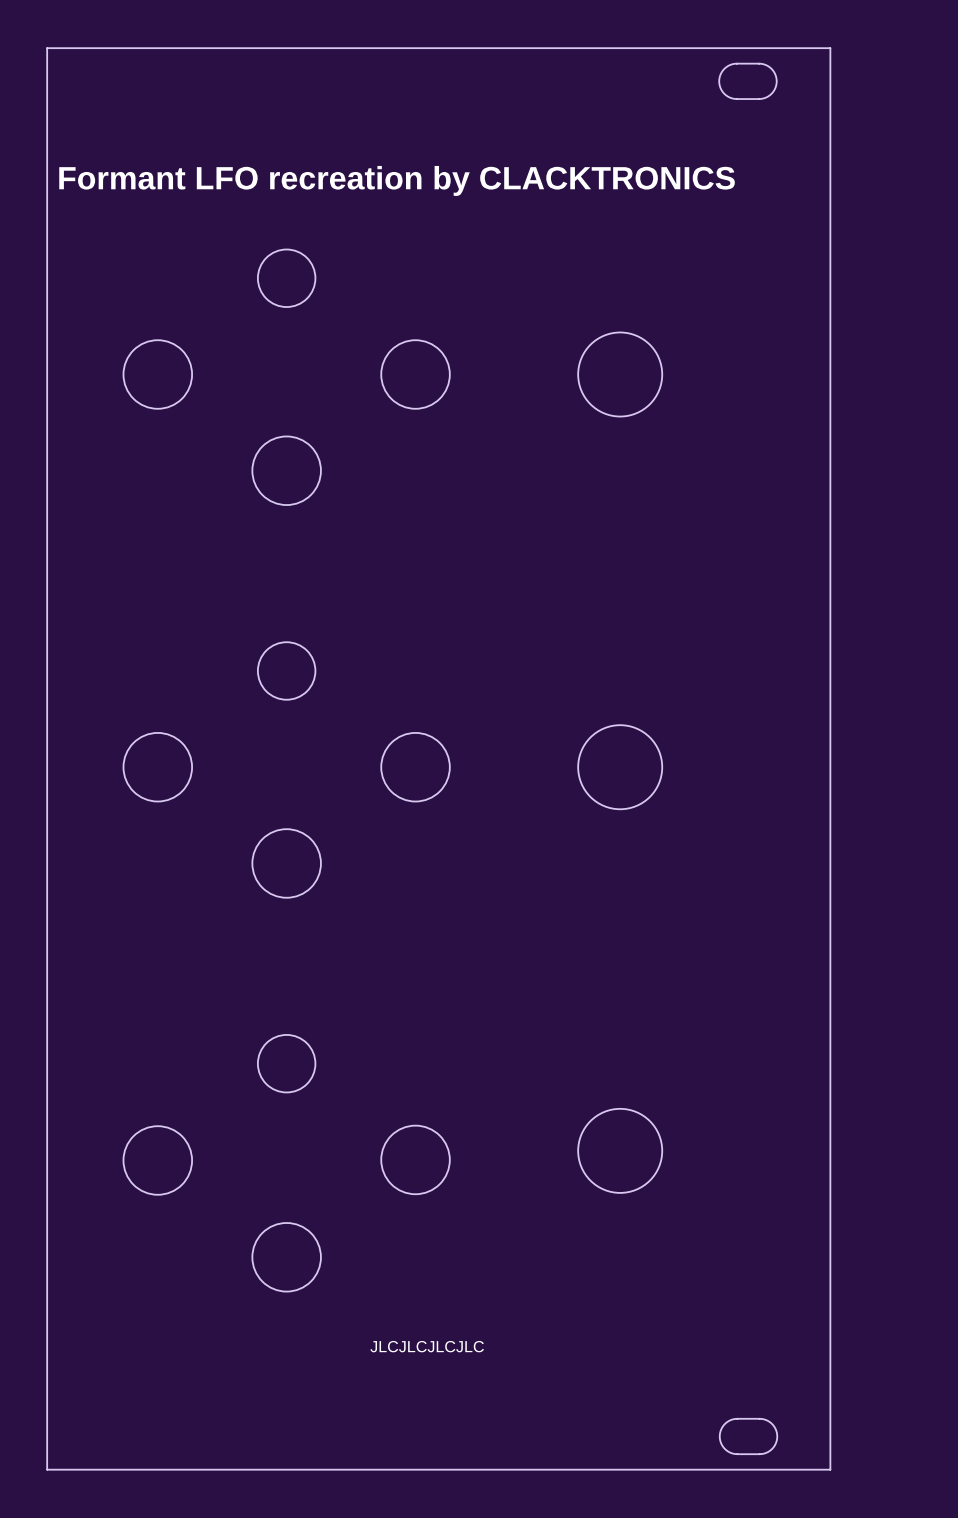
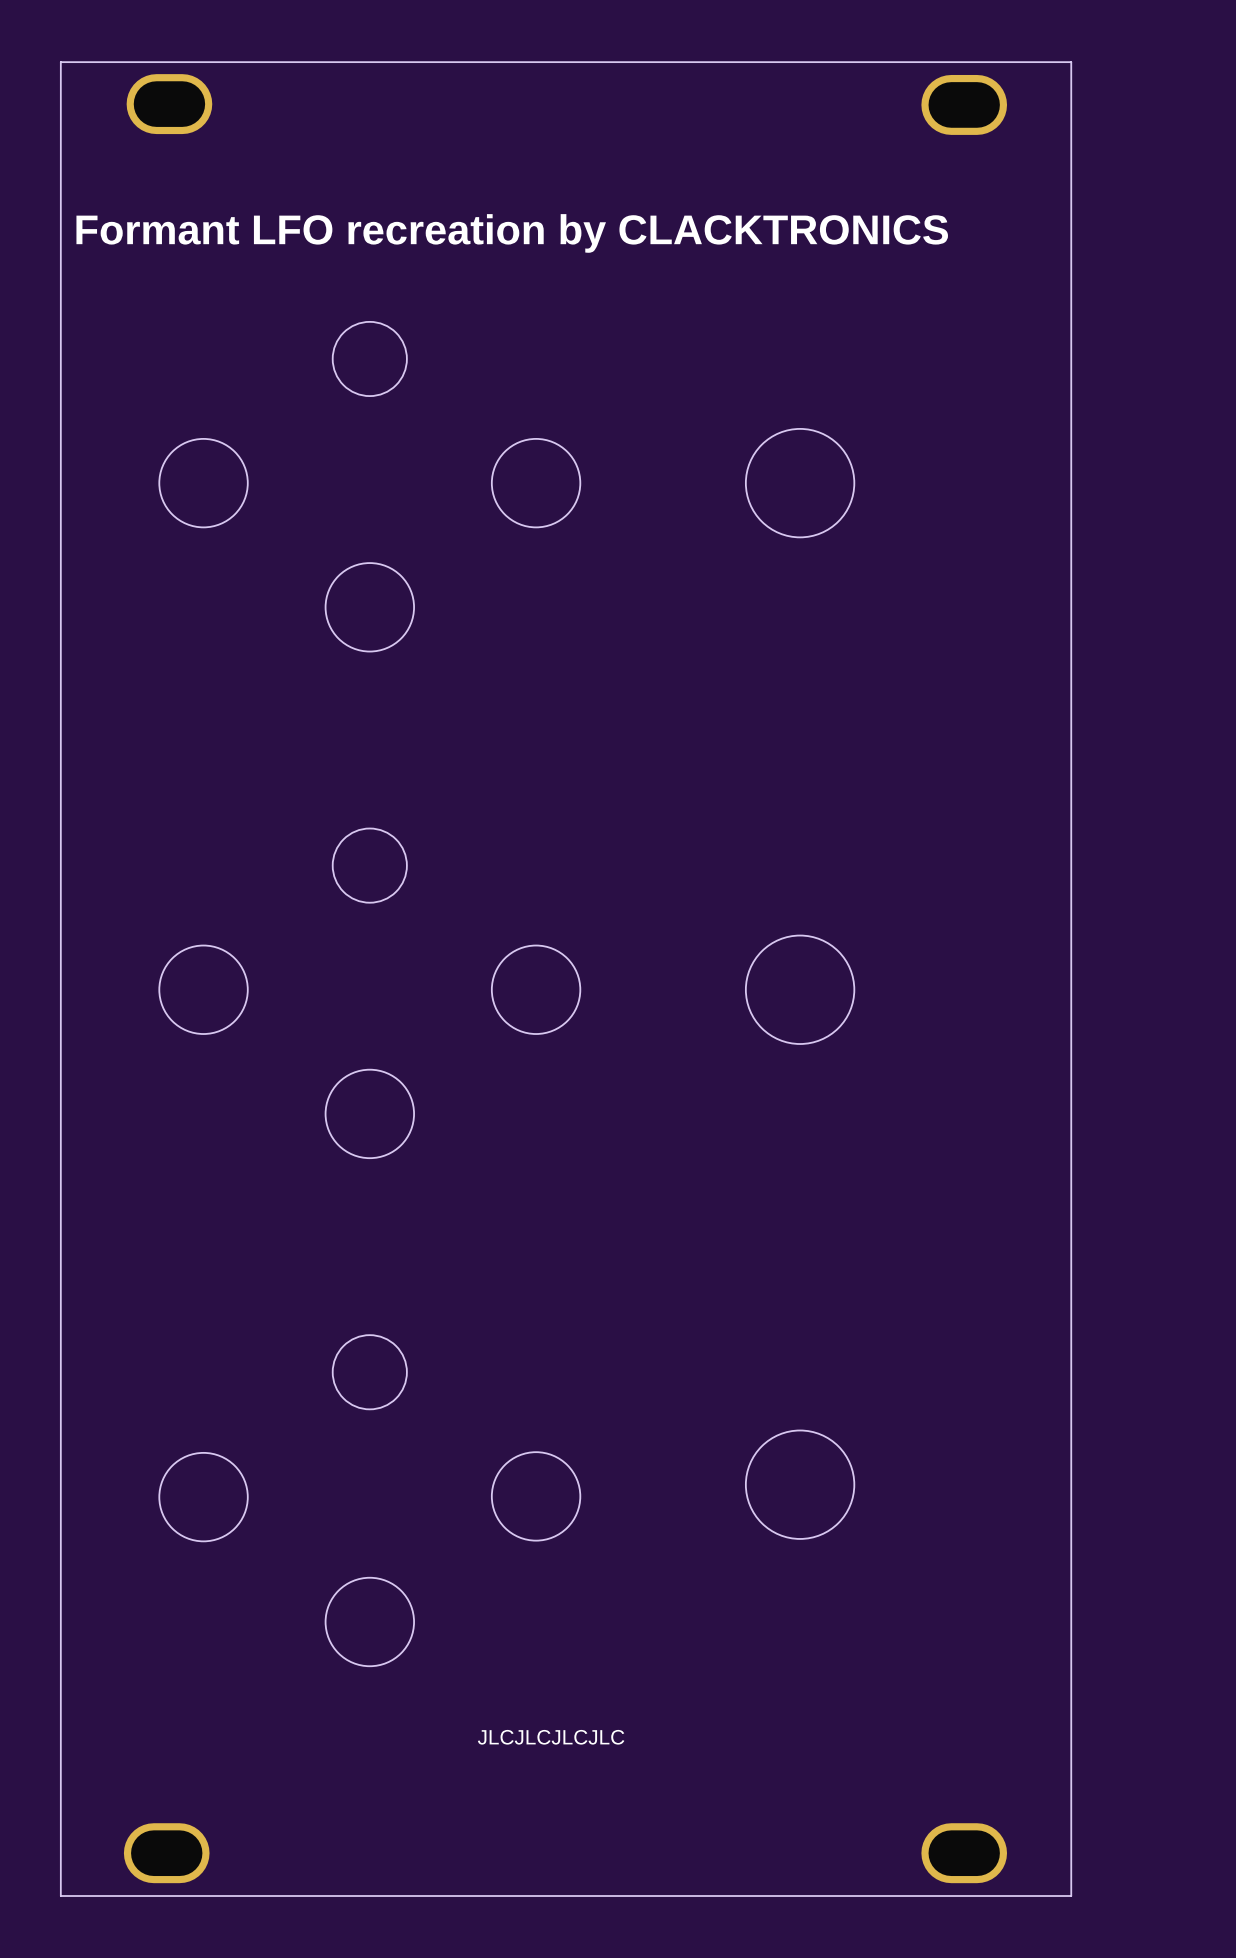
board edge: (759, 63) (734, 63) (726, 67) (719, 79) (722, 92) (734, 98) (761, 98) (769, 95) (776, 85) (776, 76) (769, 67) (759, 63) -> none
part: none -> (169, 104)
part: none -> (964, 104)
board edge: (759, 1418) (735, 1418) (725, 1423) (719, 1434) (720, 1442) (724, 1448) (731, 1453) (737, 1454) (761, 1454) (771, 1449) (776, 1440) (776, 1430) (769, 1421) (759, 1418) -> none
part: none -> (166, 1853)
part: none -> (964, 1853)

